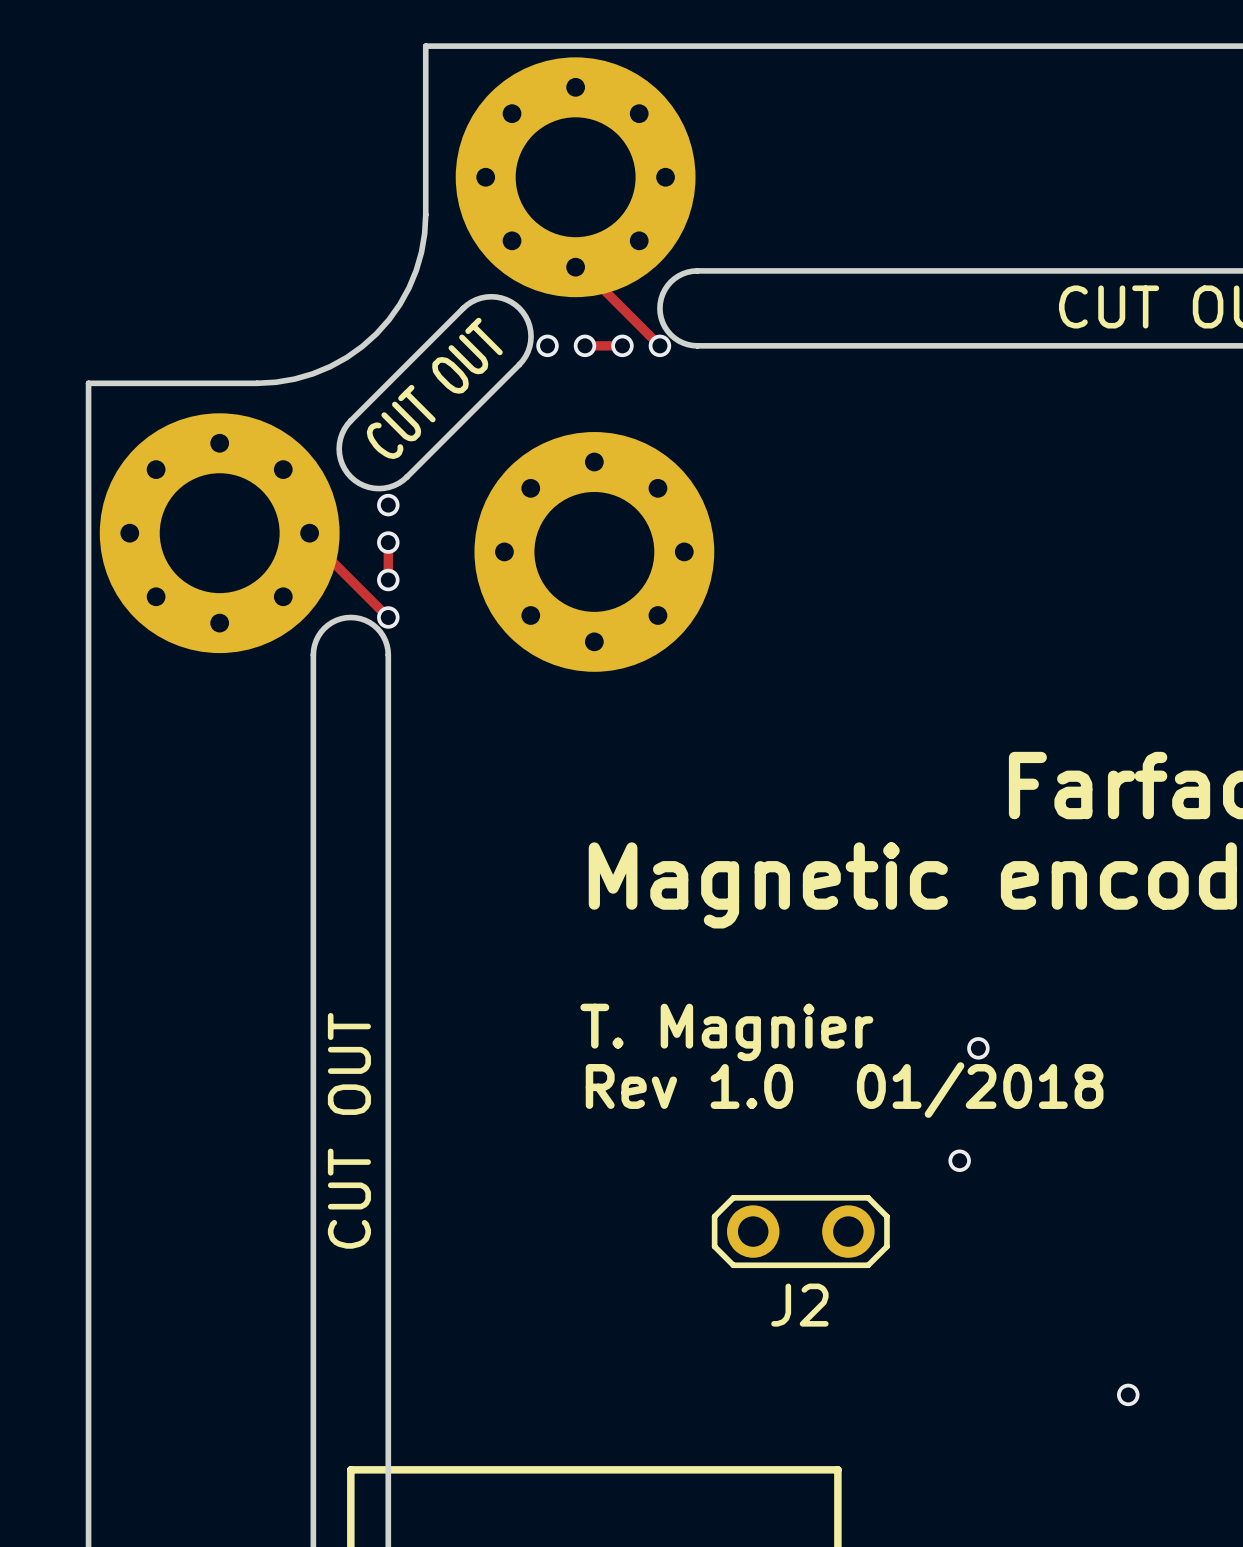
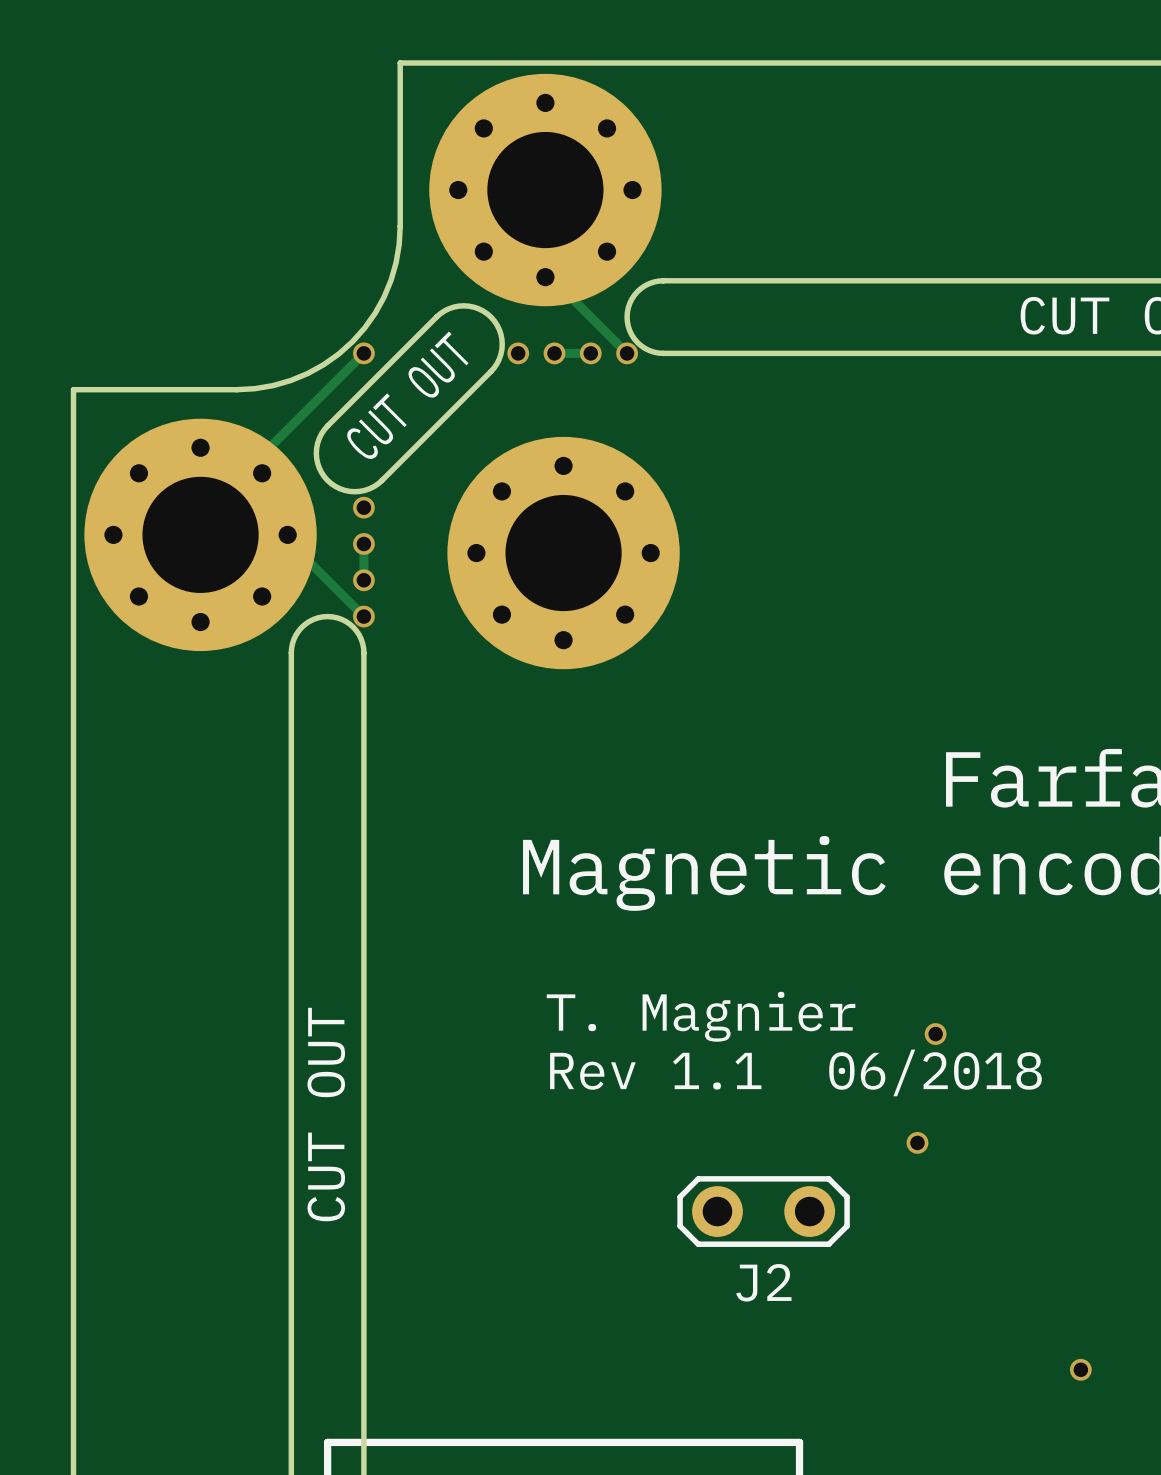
track: none -> (363, 353) (266, 450) (251, 450) (239, 462) (239, 477) (200, 516) (200, 534)
via: none -> (363, 353)
text: Rev 1.0 01/2018 (844, 1090) -> Rev 1.1 06/2018 (795, 1072)

